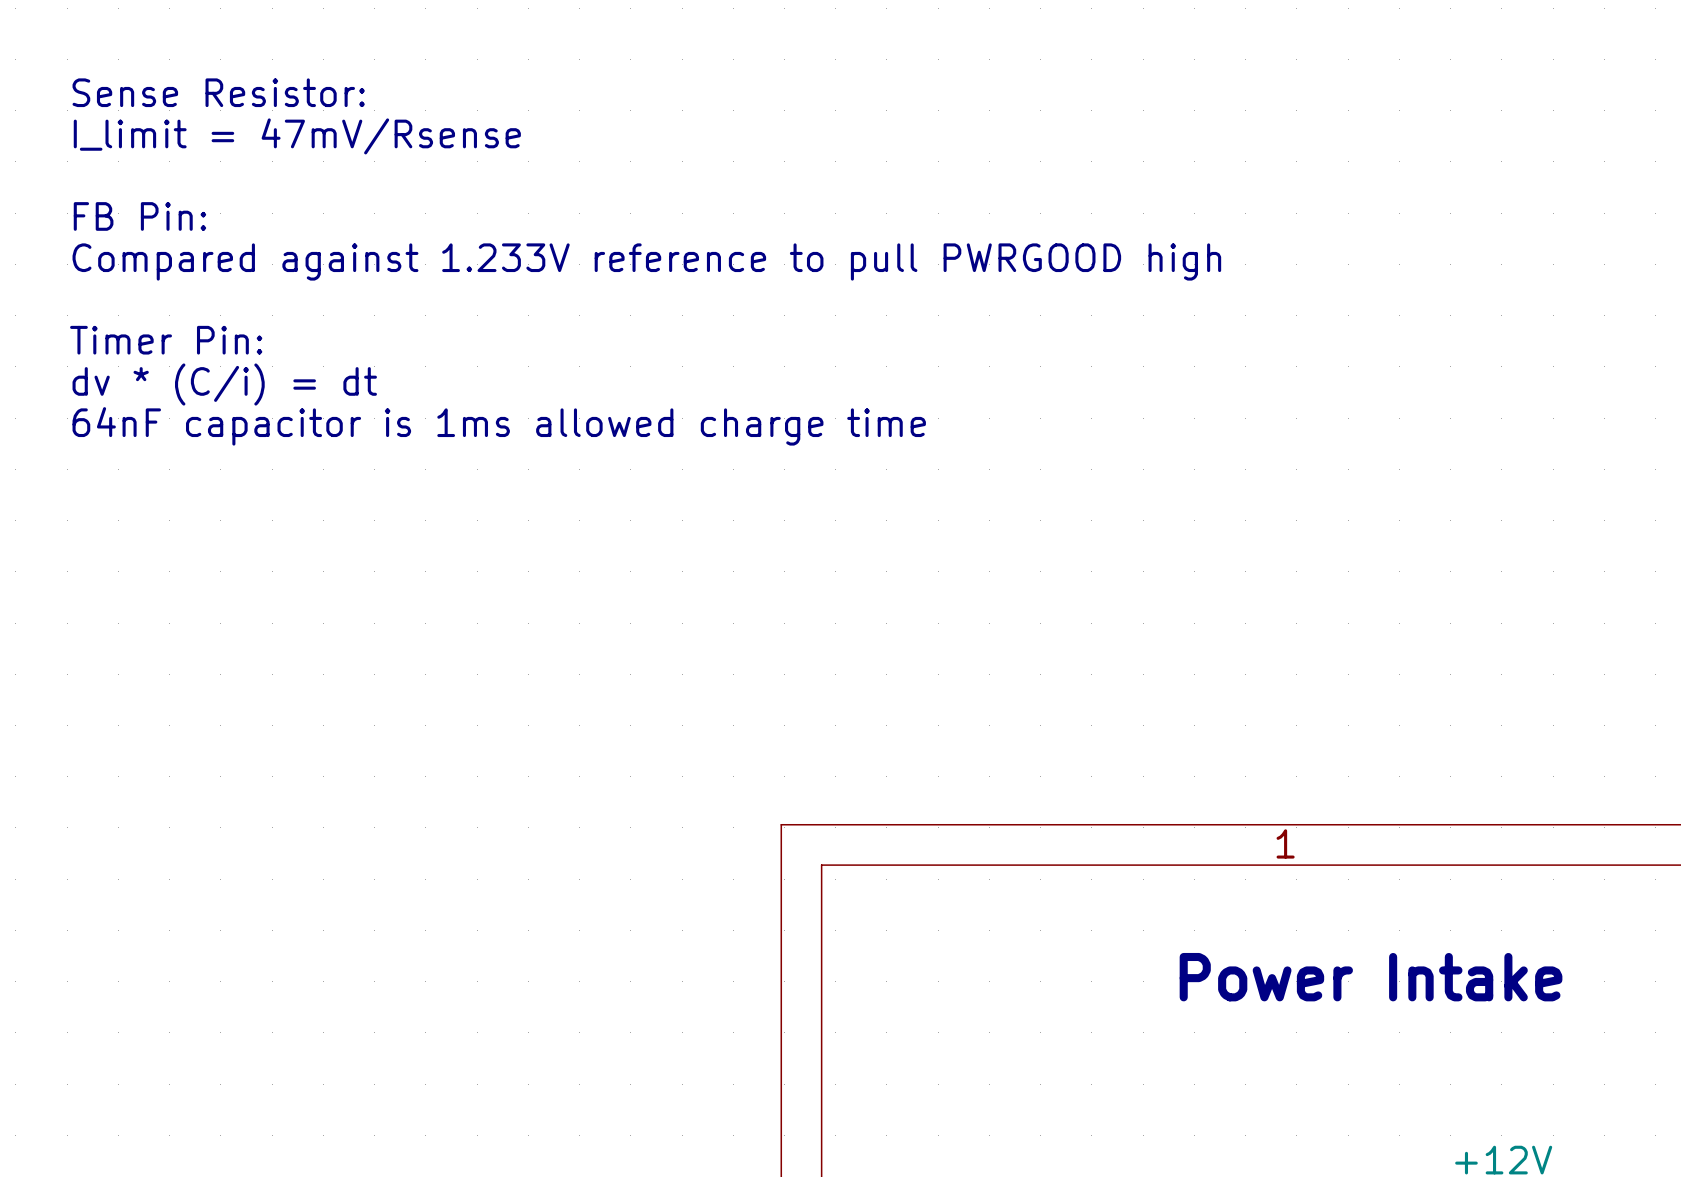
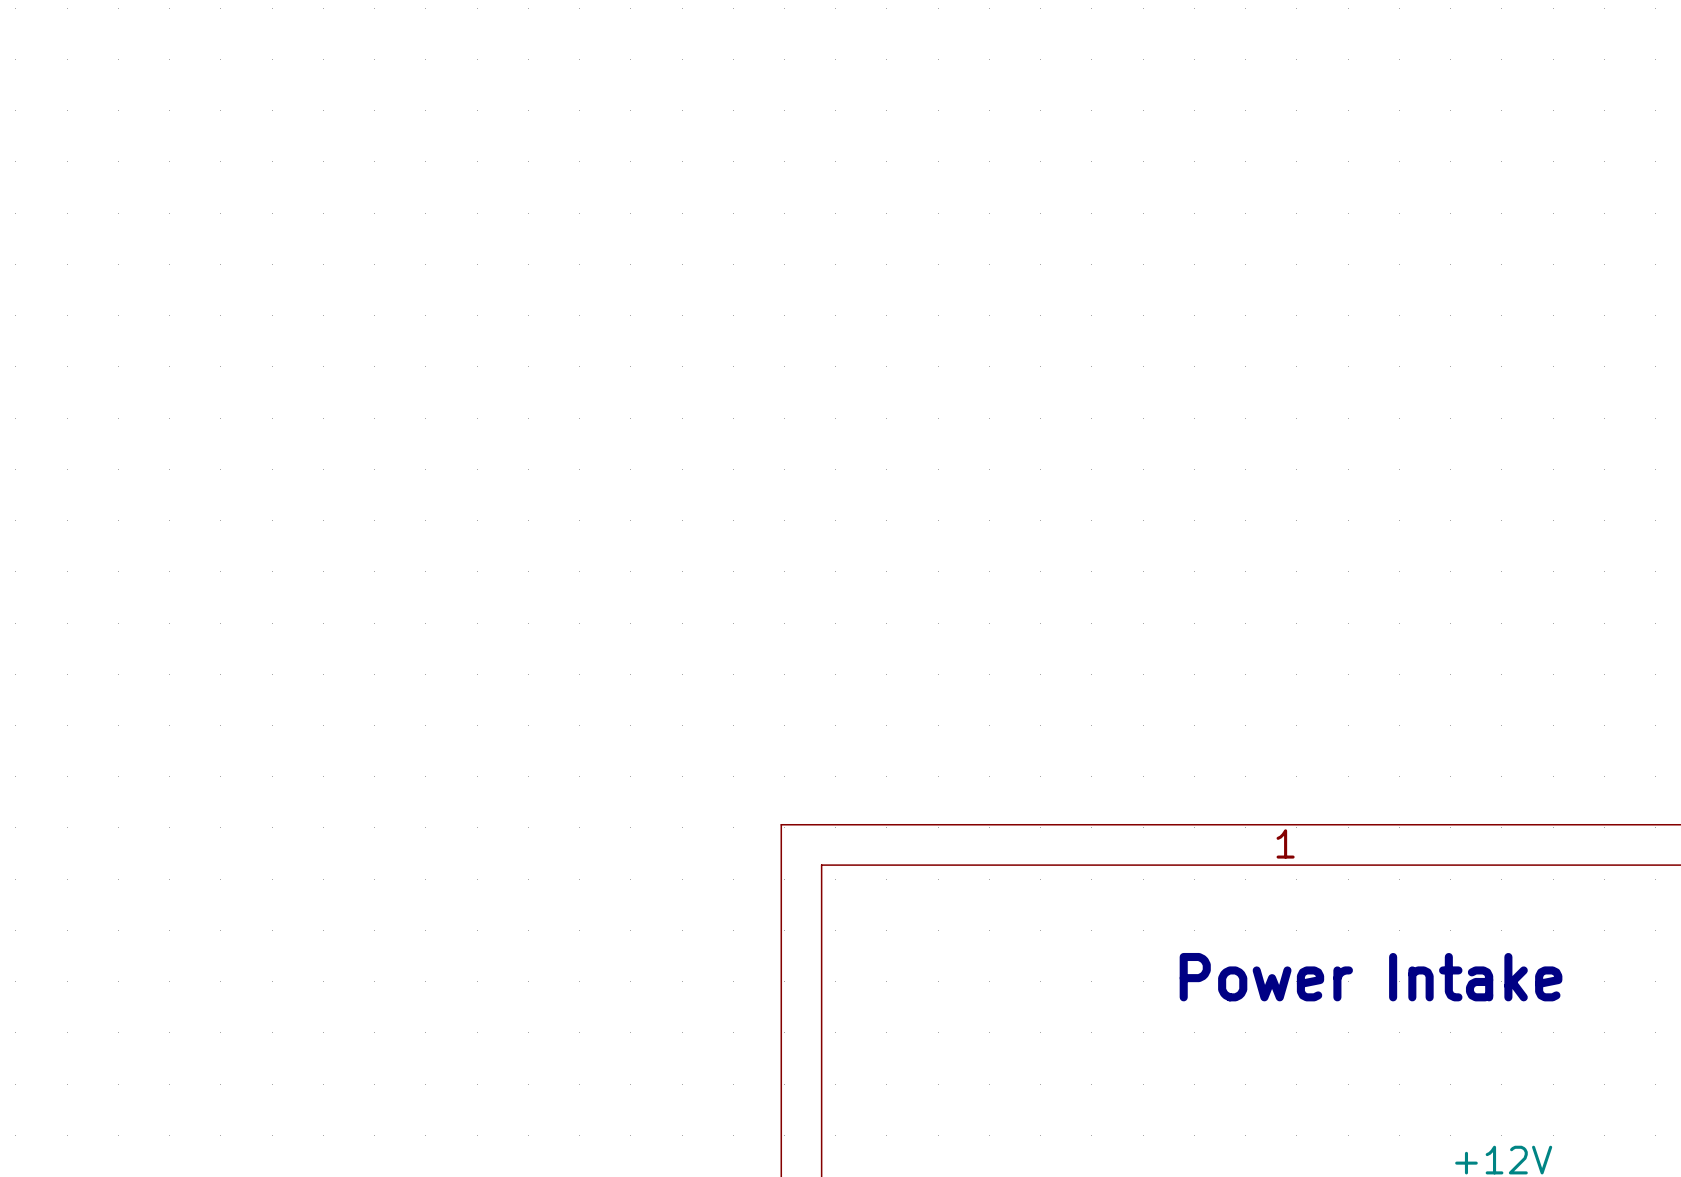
text: Sense Resistor: (218, 92) -> none
text: I_limit = 47mV/Rsense (297, 136) -> none
text: FB Pin: (139, 216) -> none
text: Compared against 1.233V reference to pull PWRGOOD high (646, 261) -> none
text: Timer Pin: (166, 340) -> none
text: dv * (C/i) = dt (224, 384) -> none
text: 64nF capacitor is 1ms allowed charge time (499, 426) -> none

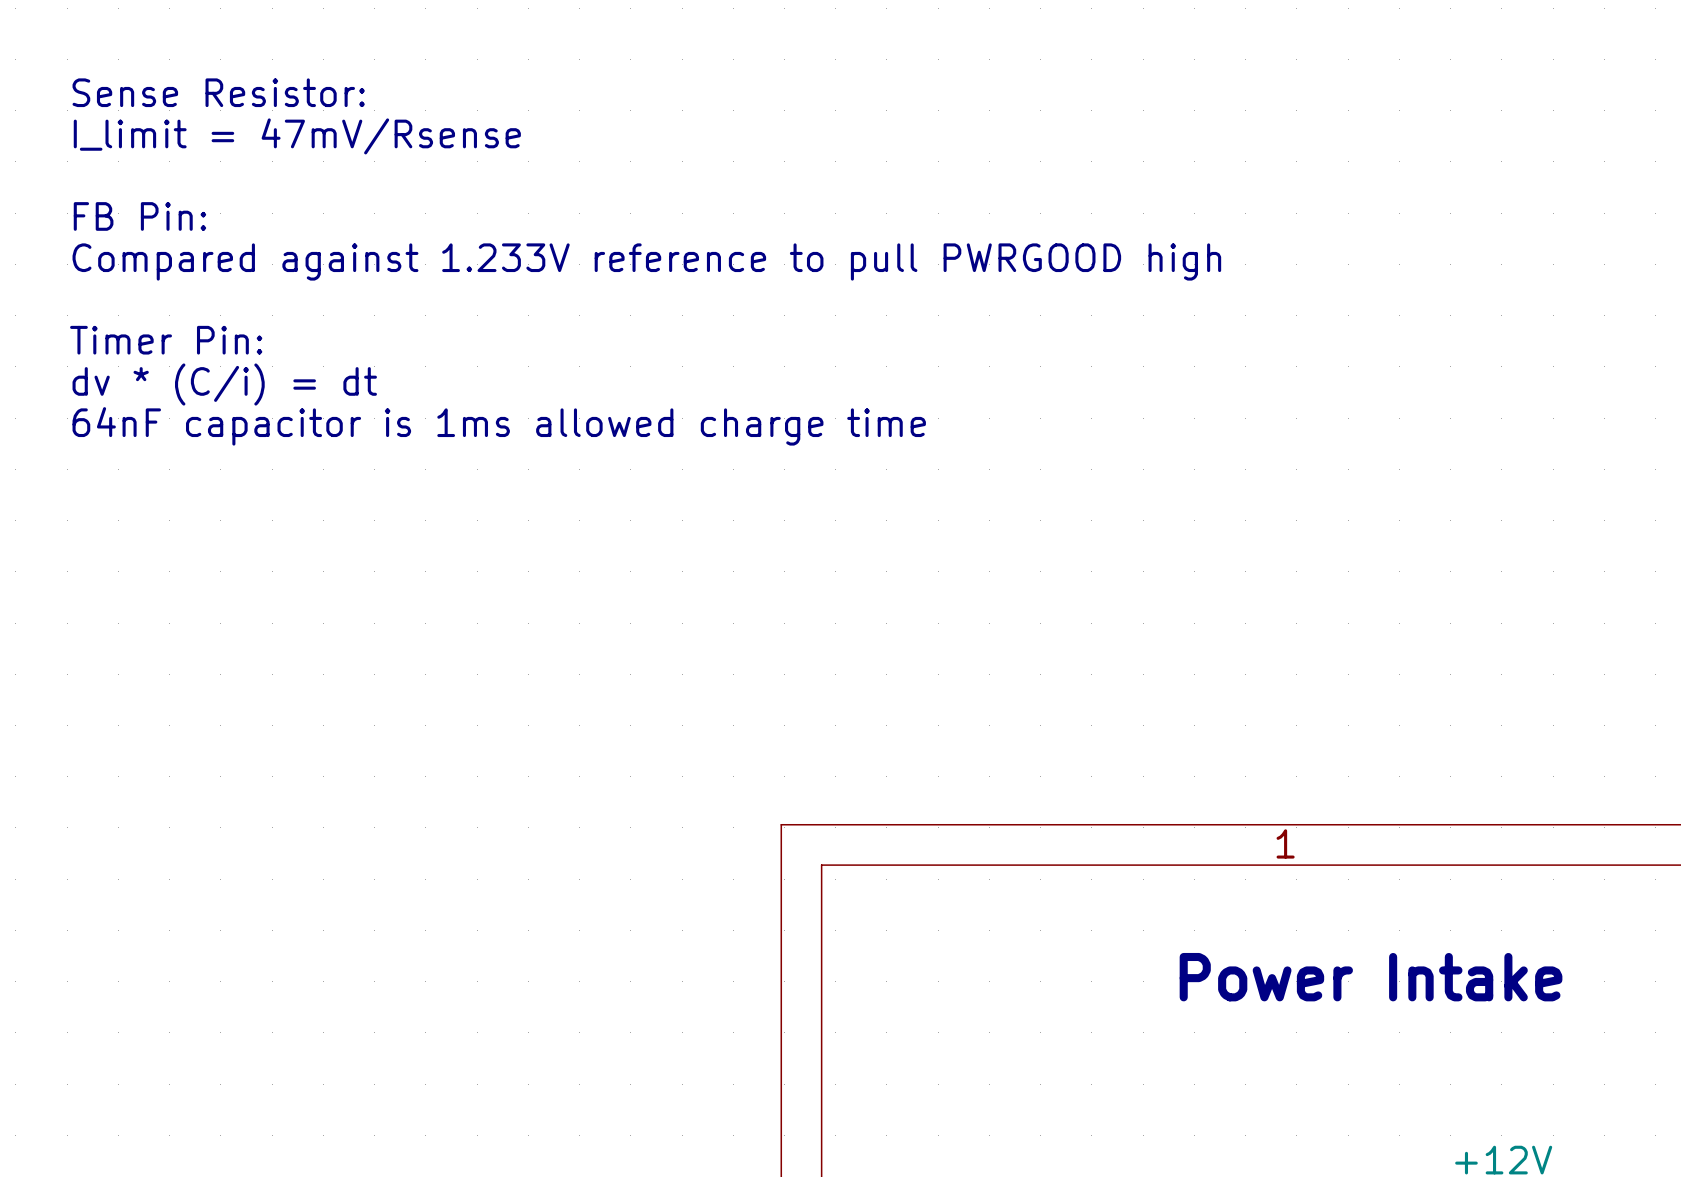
text: none -> Sense Resistor: (218, 92)
text: none -> I_limit = 47mV/Rsense (297, 136)
text: none -> FB Pin: (139, 216)
text: none -> Compared against 1.233V reference to pull PWRGOOD high (646, 261)
text: none -> Timer Pin: (166, 340)
text: none -> dv * (C/i) = dt (224, 384)
text: none -> 64nF capacitor is 1ms allowed charge time (499, 426)

